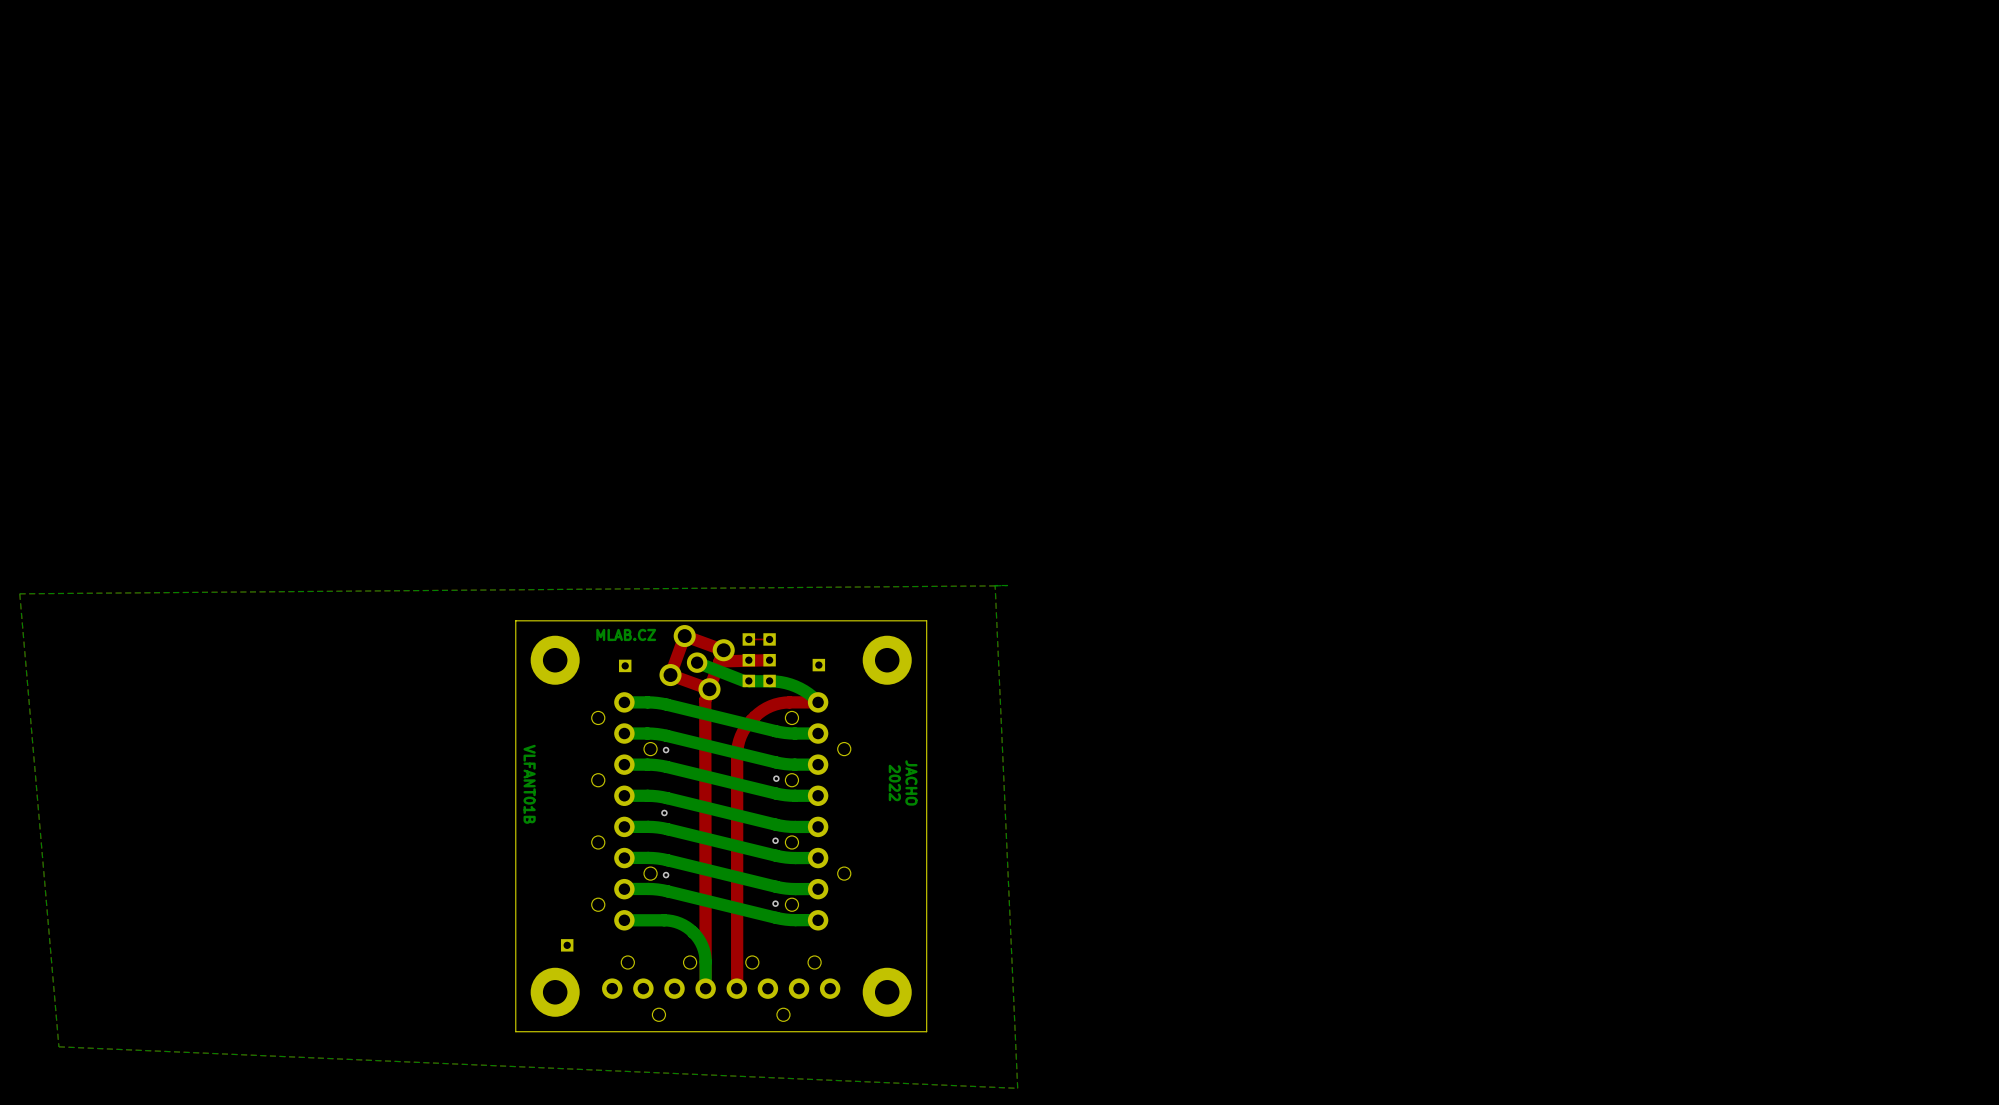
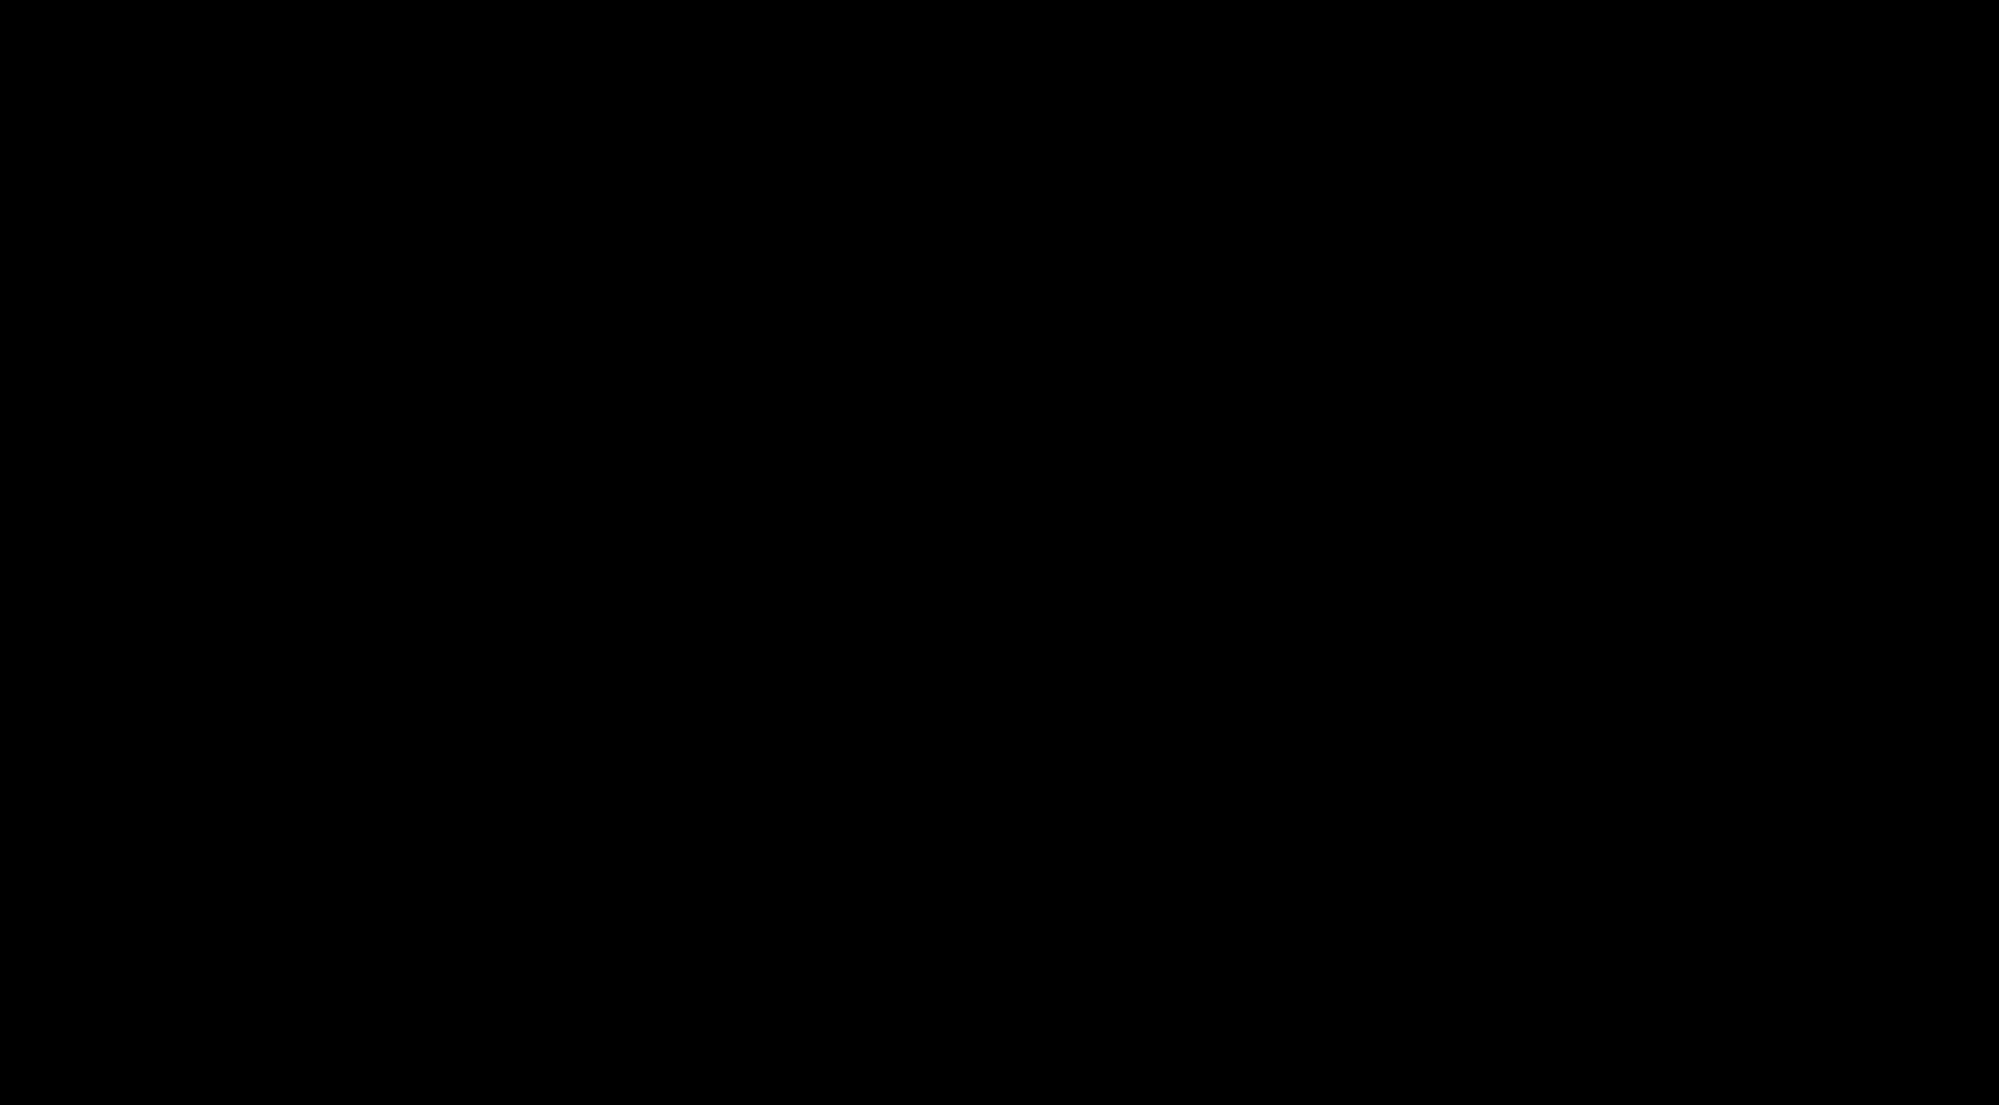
bottom zone outline: (995, 585) (1017, 1088) (58, 1046) (19, 593) (995, 585) -> none
bottom zone outline: (995, 585) (995, 585) (1007, 585) (995, 585) -> none
board edge: (926, 620) (515, 620) (515, 1031) (926, 1031) (926, 620) -> none
text: MLAB.CZ (626, 634) -> none
top track: (769, 639) (748, 639) -> none
part: (555, 660) -> none
part: (759, 660) -> none
top track: (769, 660) (719, 661) -> none
part: (887, 660) -> none
bottom track: (697, 662) (744, 681) -> none
part: (697, 662) -> none
part: (625, 665) -> none
part: (818, 665) -> none
bottom track: (748, 680) (775, 681) (790, 684) (804, 690) (818, 702) -> none
top track: (709, 689) (670, 675) (684, 636) (723, 650) (705, 700) (705, 988) -> none
bottom track: (624, 702) (662, 703) (780, 732) (818, 733) -> none
top track: (818, 702) (784, 702) (766, 708) (748, 723) (739, 740) (737, 754) (736, 988) -> none
bottom track: (624, 733) (661, 734) (780, 763) (818, 764) -> none
via: (666, 750) -> none
bottom track: (624, 764) (662, 765) (780, 794) (818, 795) -> none
via: (776, 778) -> none
text: 2022 (894, 782) -> none
text: JACHO (911, 782) -> none
text: VLFANT01B (529, 784) -> none
bottom track: (624, 795) (662, 797) (780, 825) (818, 826) -> none
part: (624, 811) -> none
part: (818, 811) -> none
via: (664, 812) -> none
bottom track: (624, 826) (662, 828) (780, 856) (818, 857) -> none
via: (775, 840) -> none
bottom track: (624, 857) (662, 859) (780, 887) (818, 889) -> none
via: (666, 875) -> none
bottom track: (624, 888) (662, 890) (780, 918) (818, 920) -> none
via: (775, 903) -> none
bottom track: (624, 920) (668, 920) (679, 923) (690, 929) (698, 939) (703, 949) (705, 988) -> none
part: (567, 945) -> none
part: (721, 988) -> none
part: (555, 992) -> none
part: (887, 992) -> none

